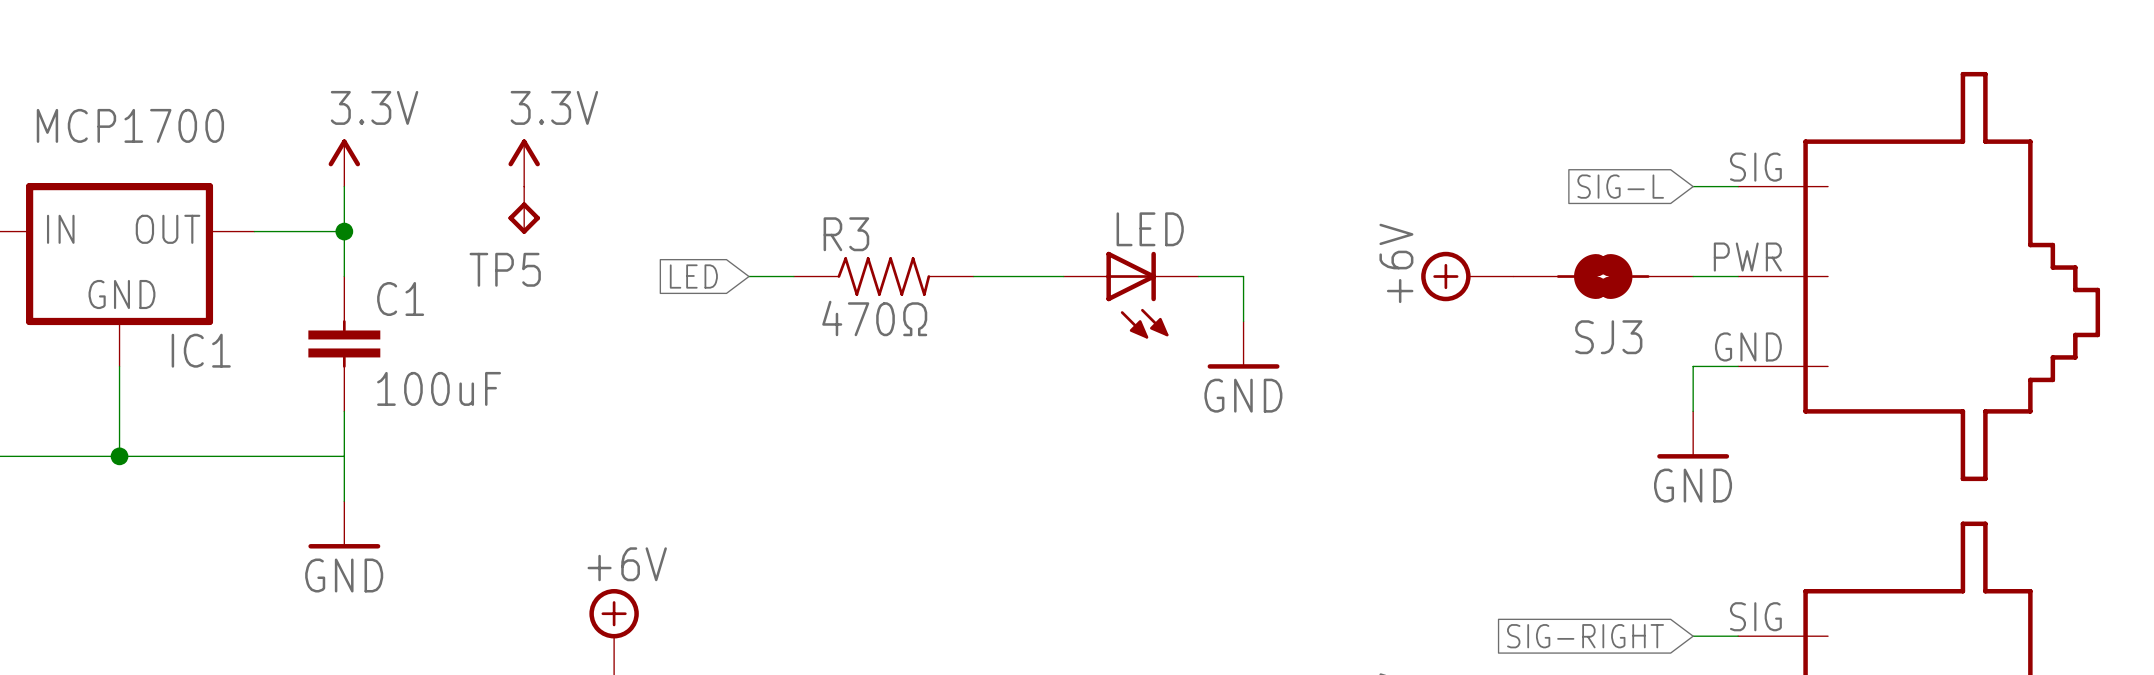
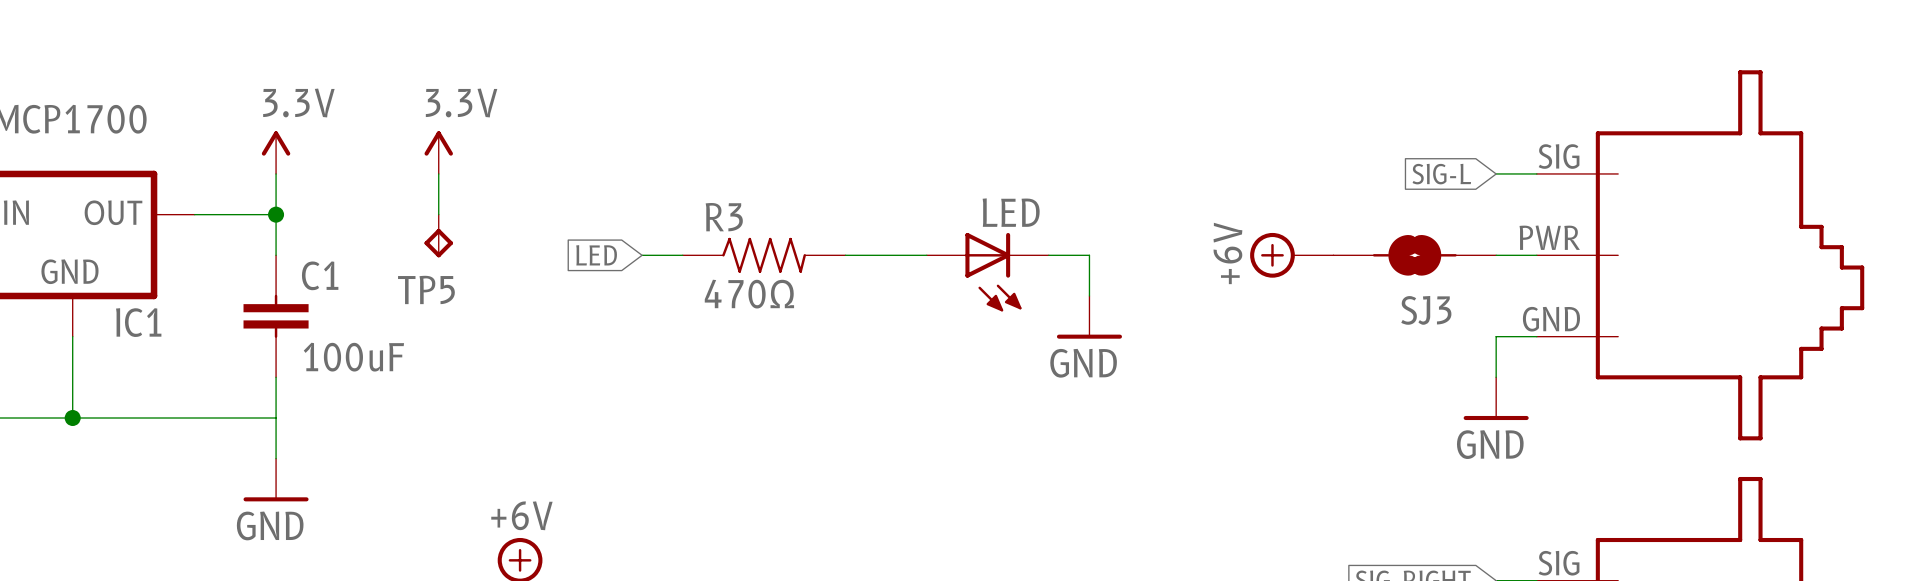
TP5 position: (524, 210) -> (438, 236)

